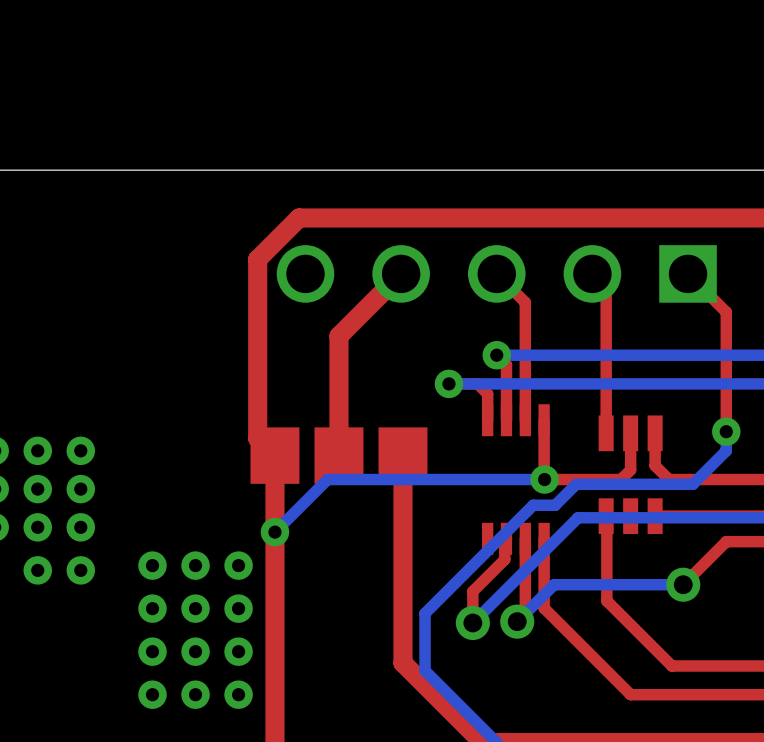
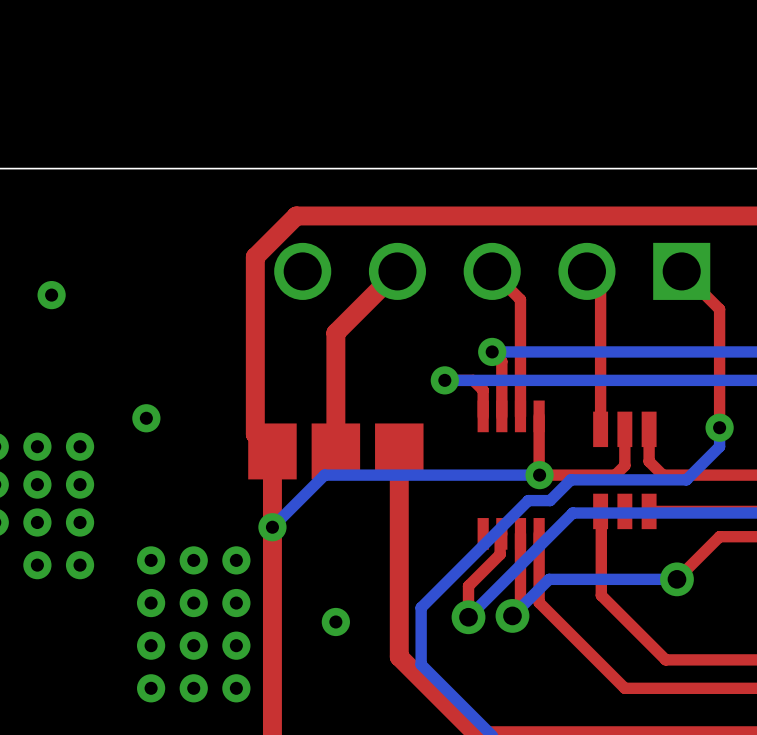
via: none -> (51, 295)
via: none -> (146, 418)
via: none -> (335, 621)

